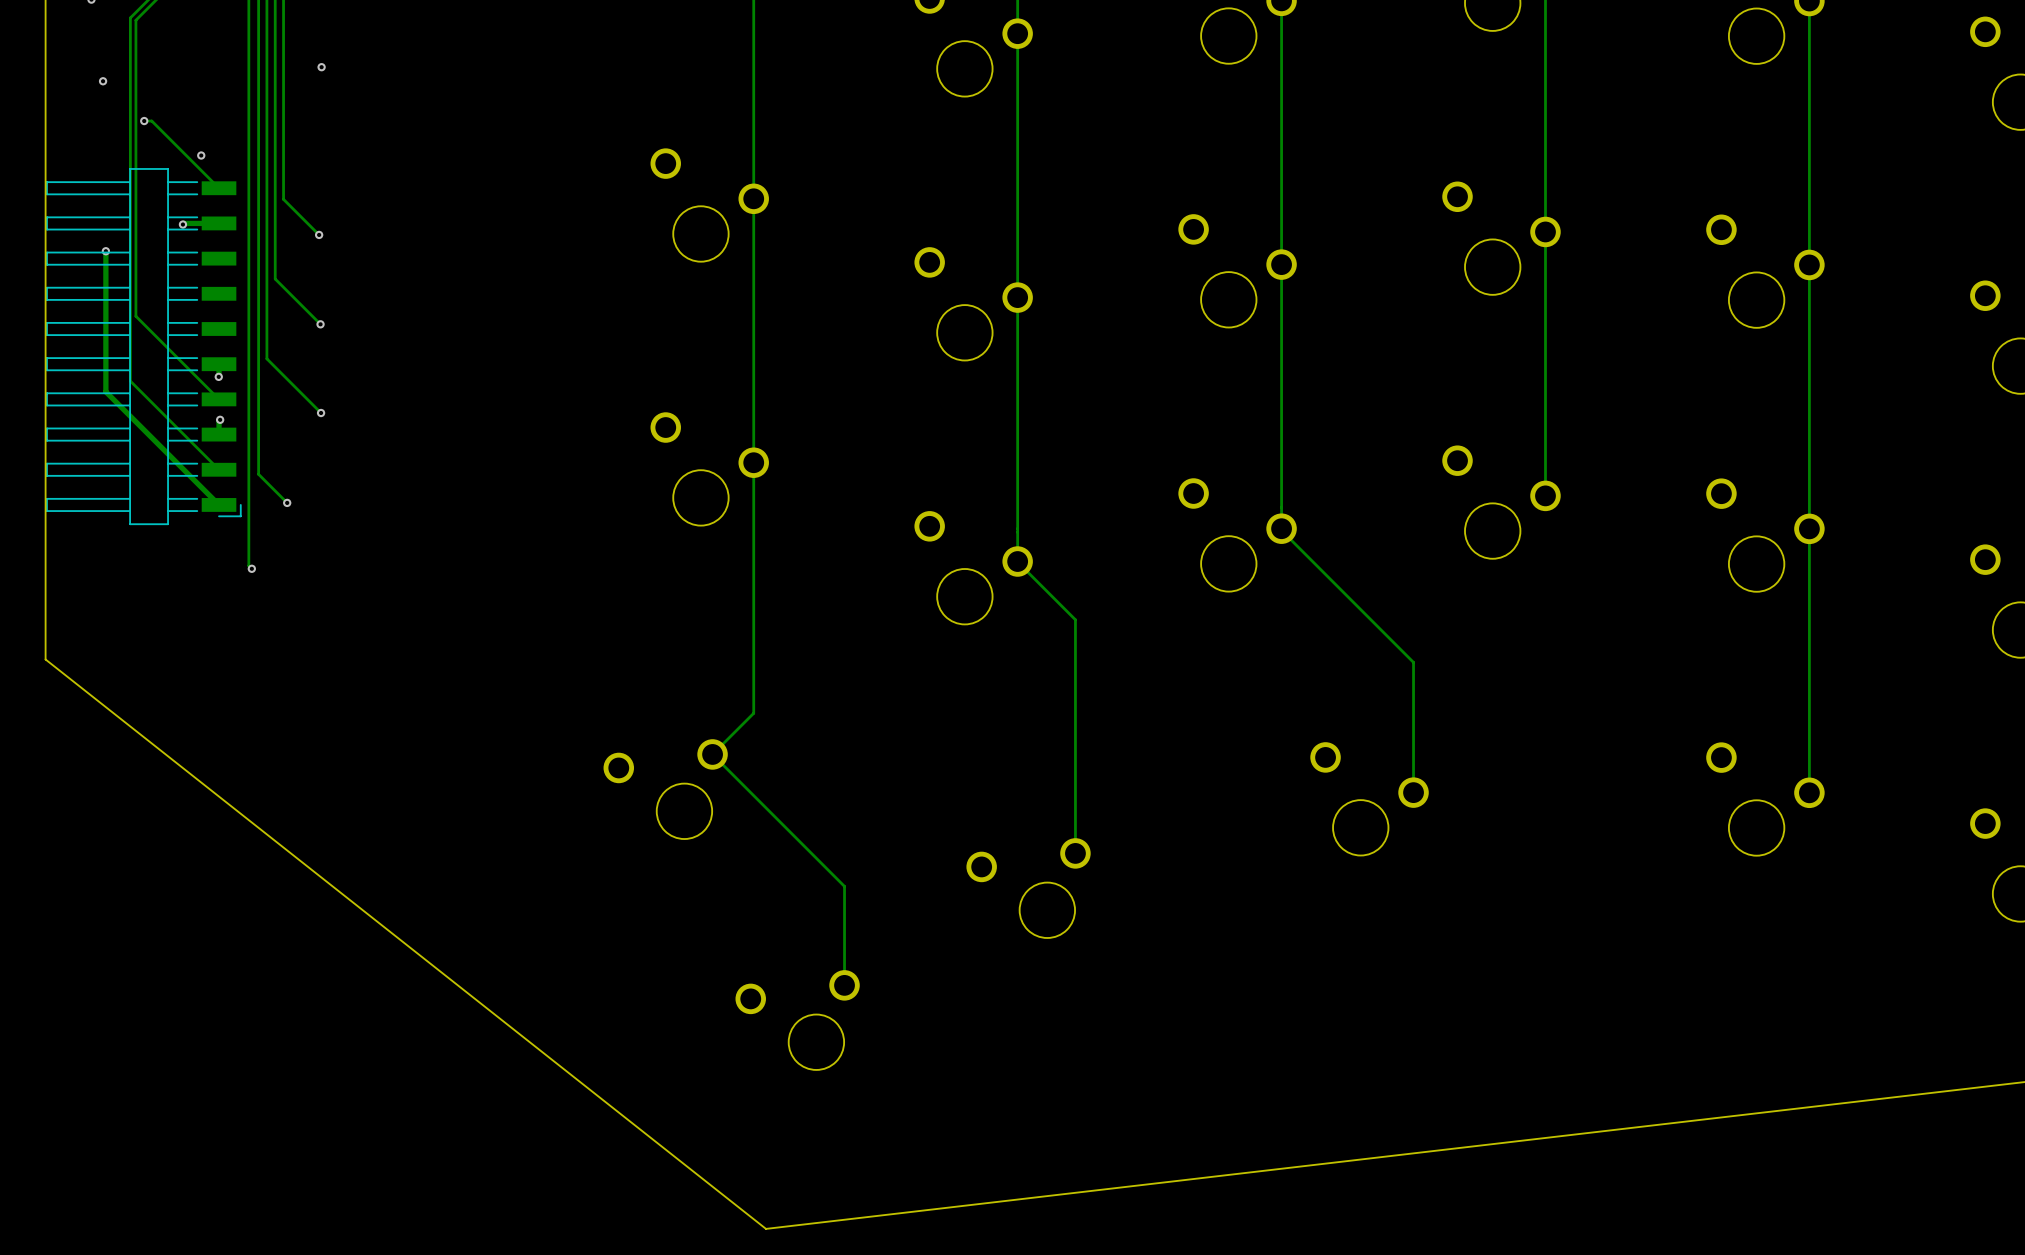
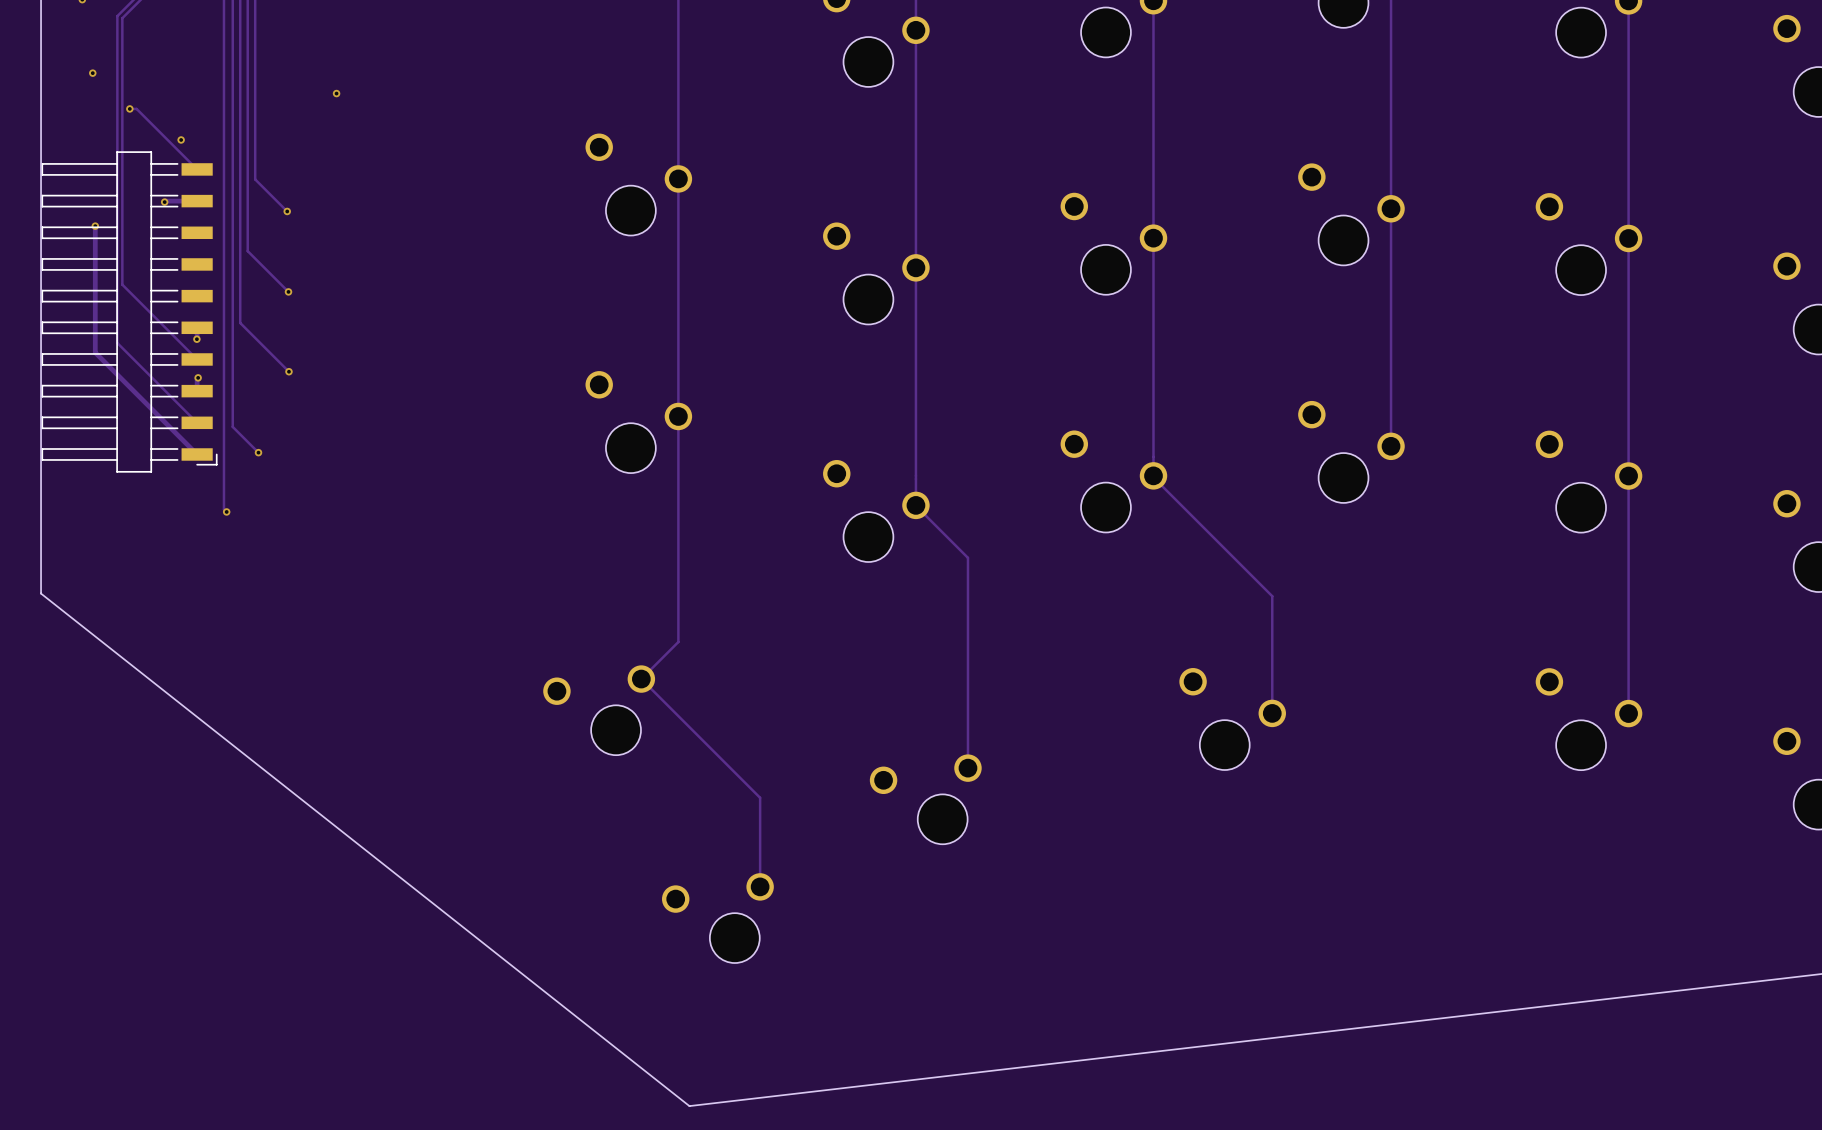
via position: (321, 67) -> (336, 93)

